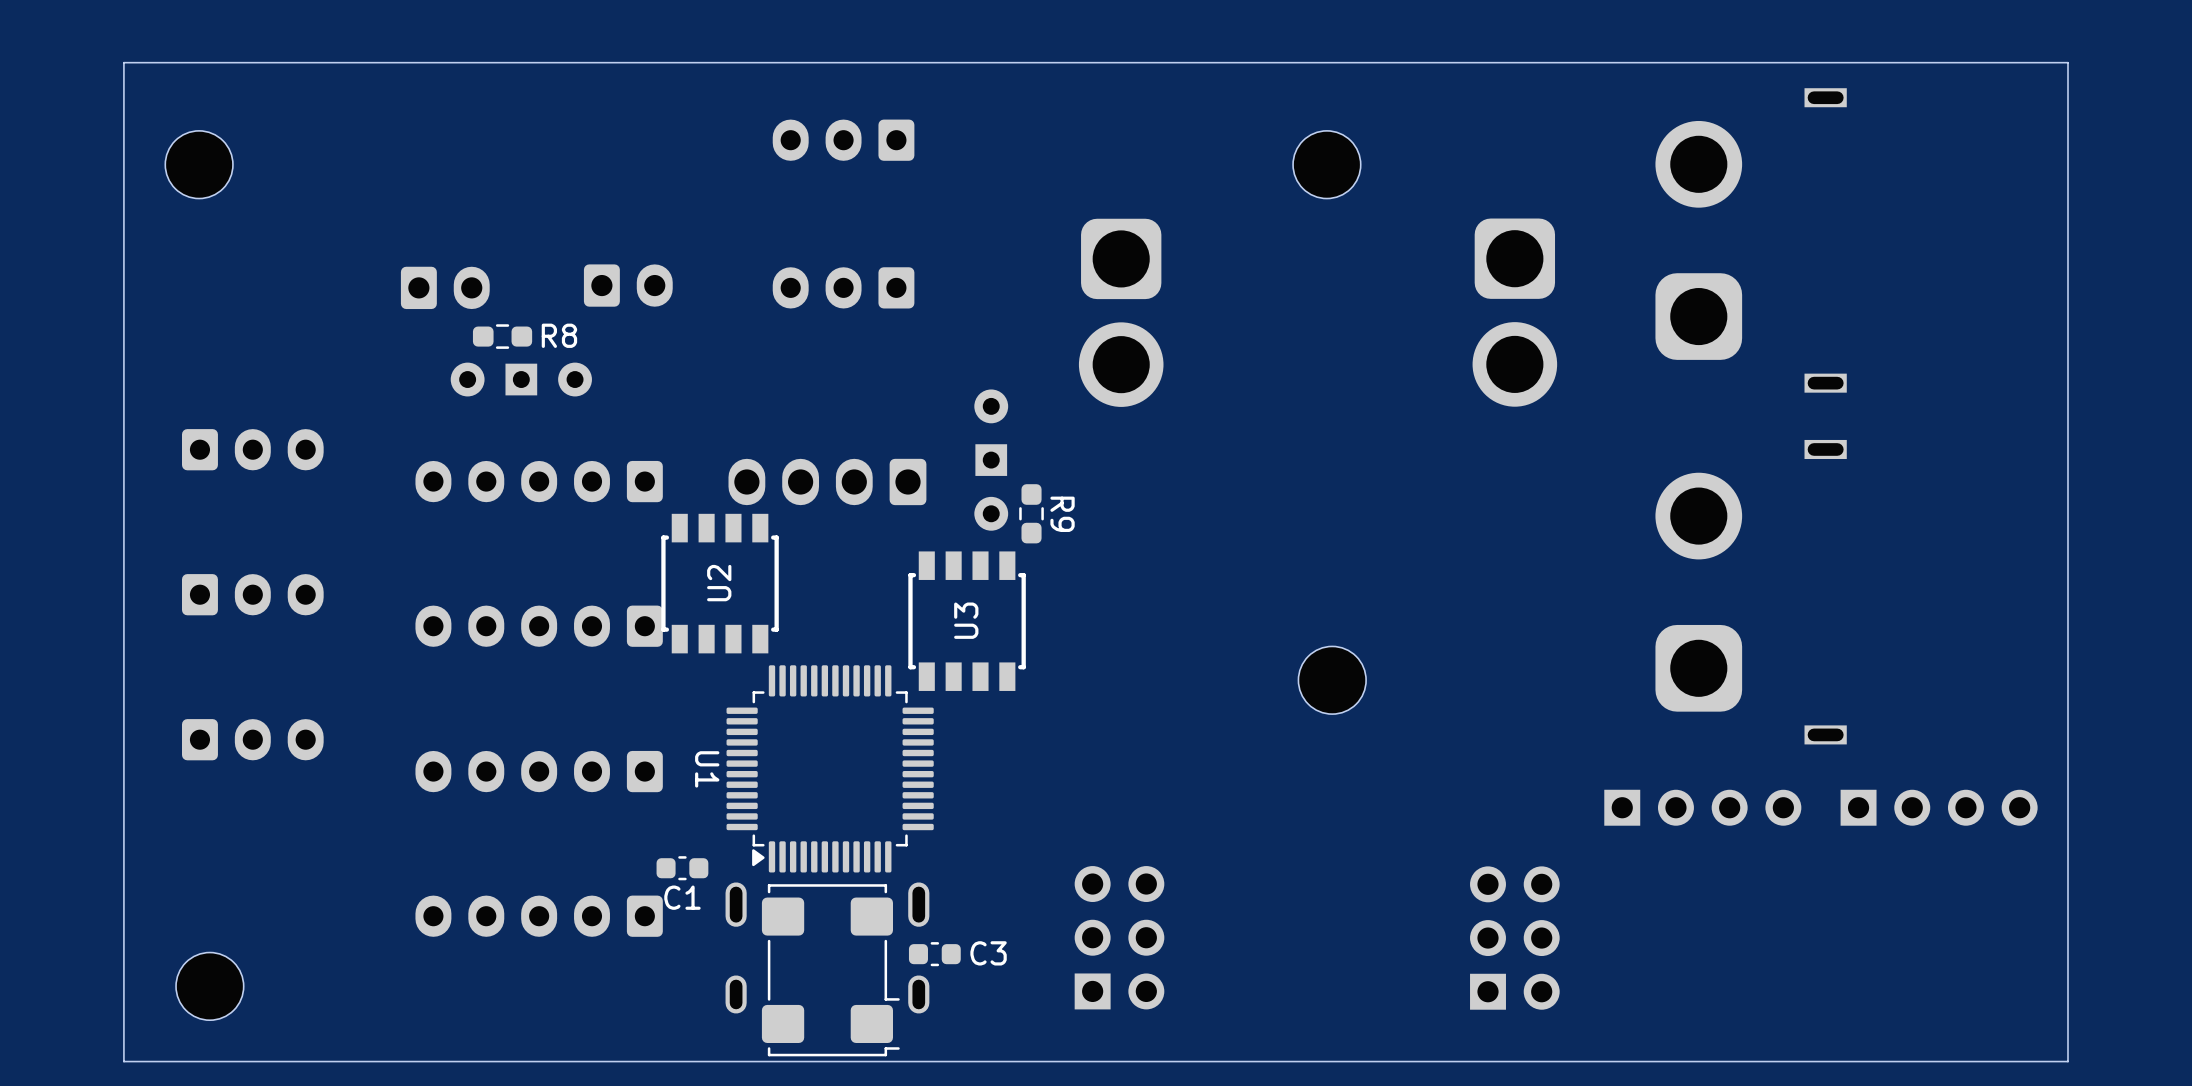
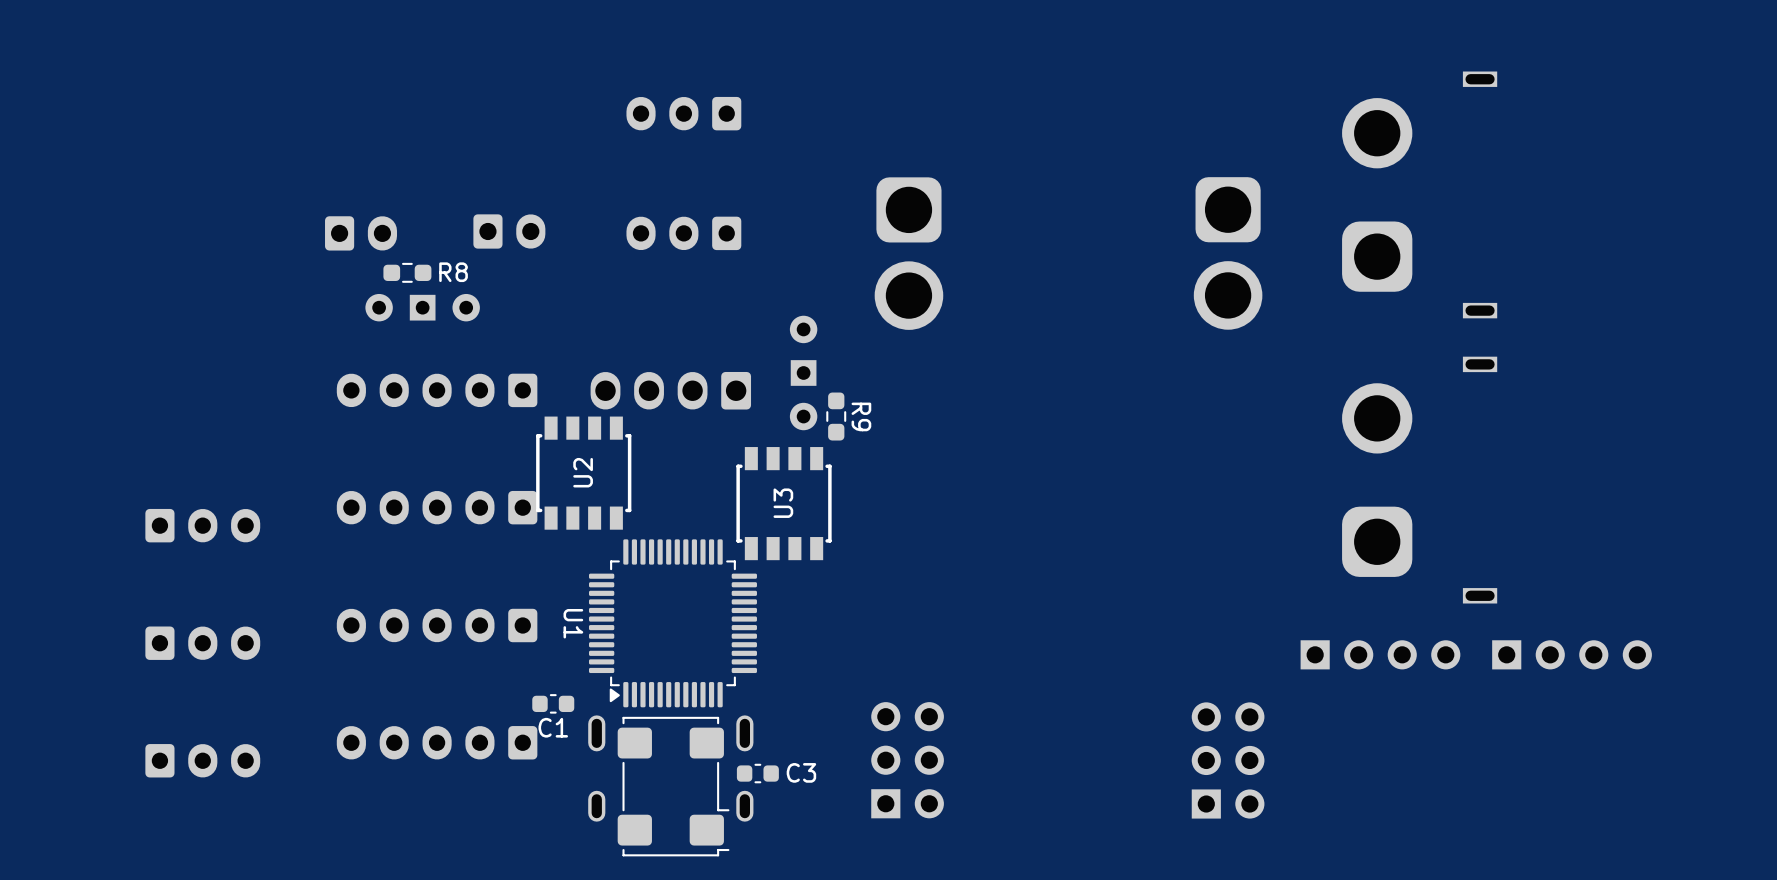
board edge: (2067, 62) (123, 62) (123, 1061) (2067, 1061) (2067, 62) -> none
part: (199, 164) -> none
part: (1326, 164) -> none
part: (252, 449) -> none
part: (252, 594) -> none
part: none -> (202, 525)
part: (1332, 680) -> none
part: (252, 739) -> none
part: none -> (202, 643)
part: none -> (202, 760)
part: (209, 986) -> none

